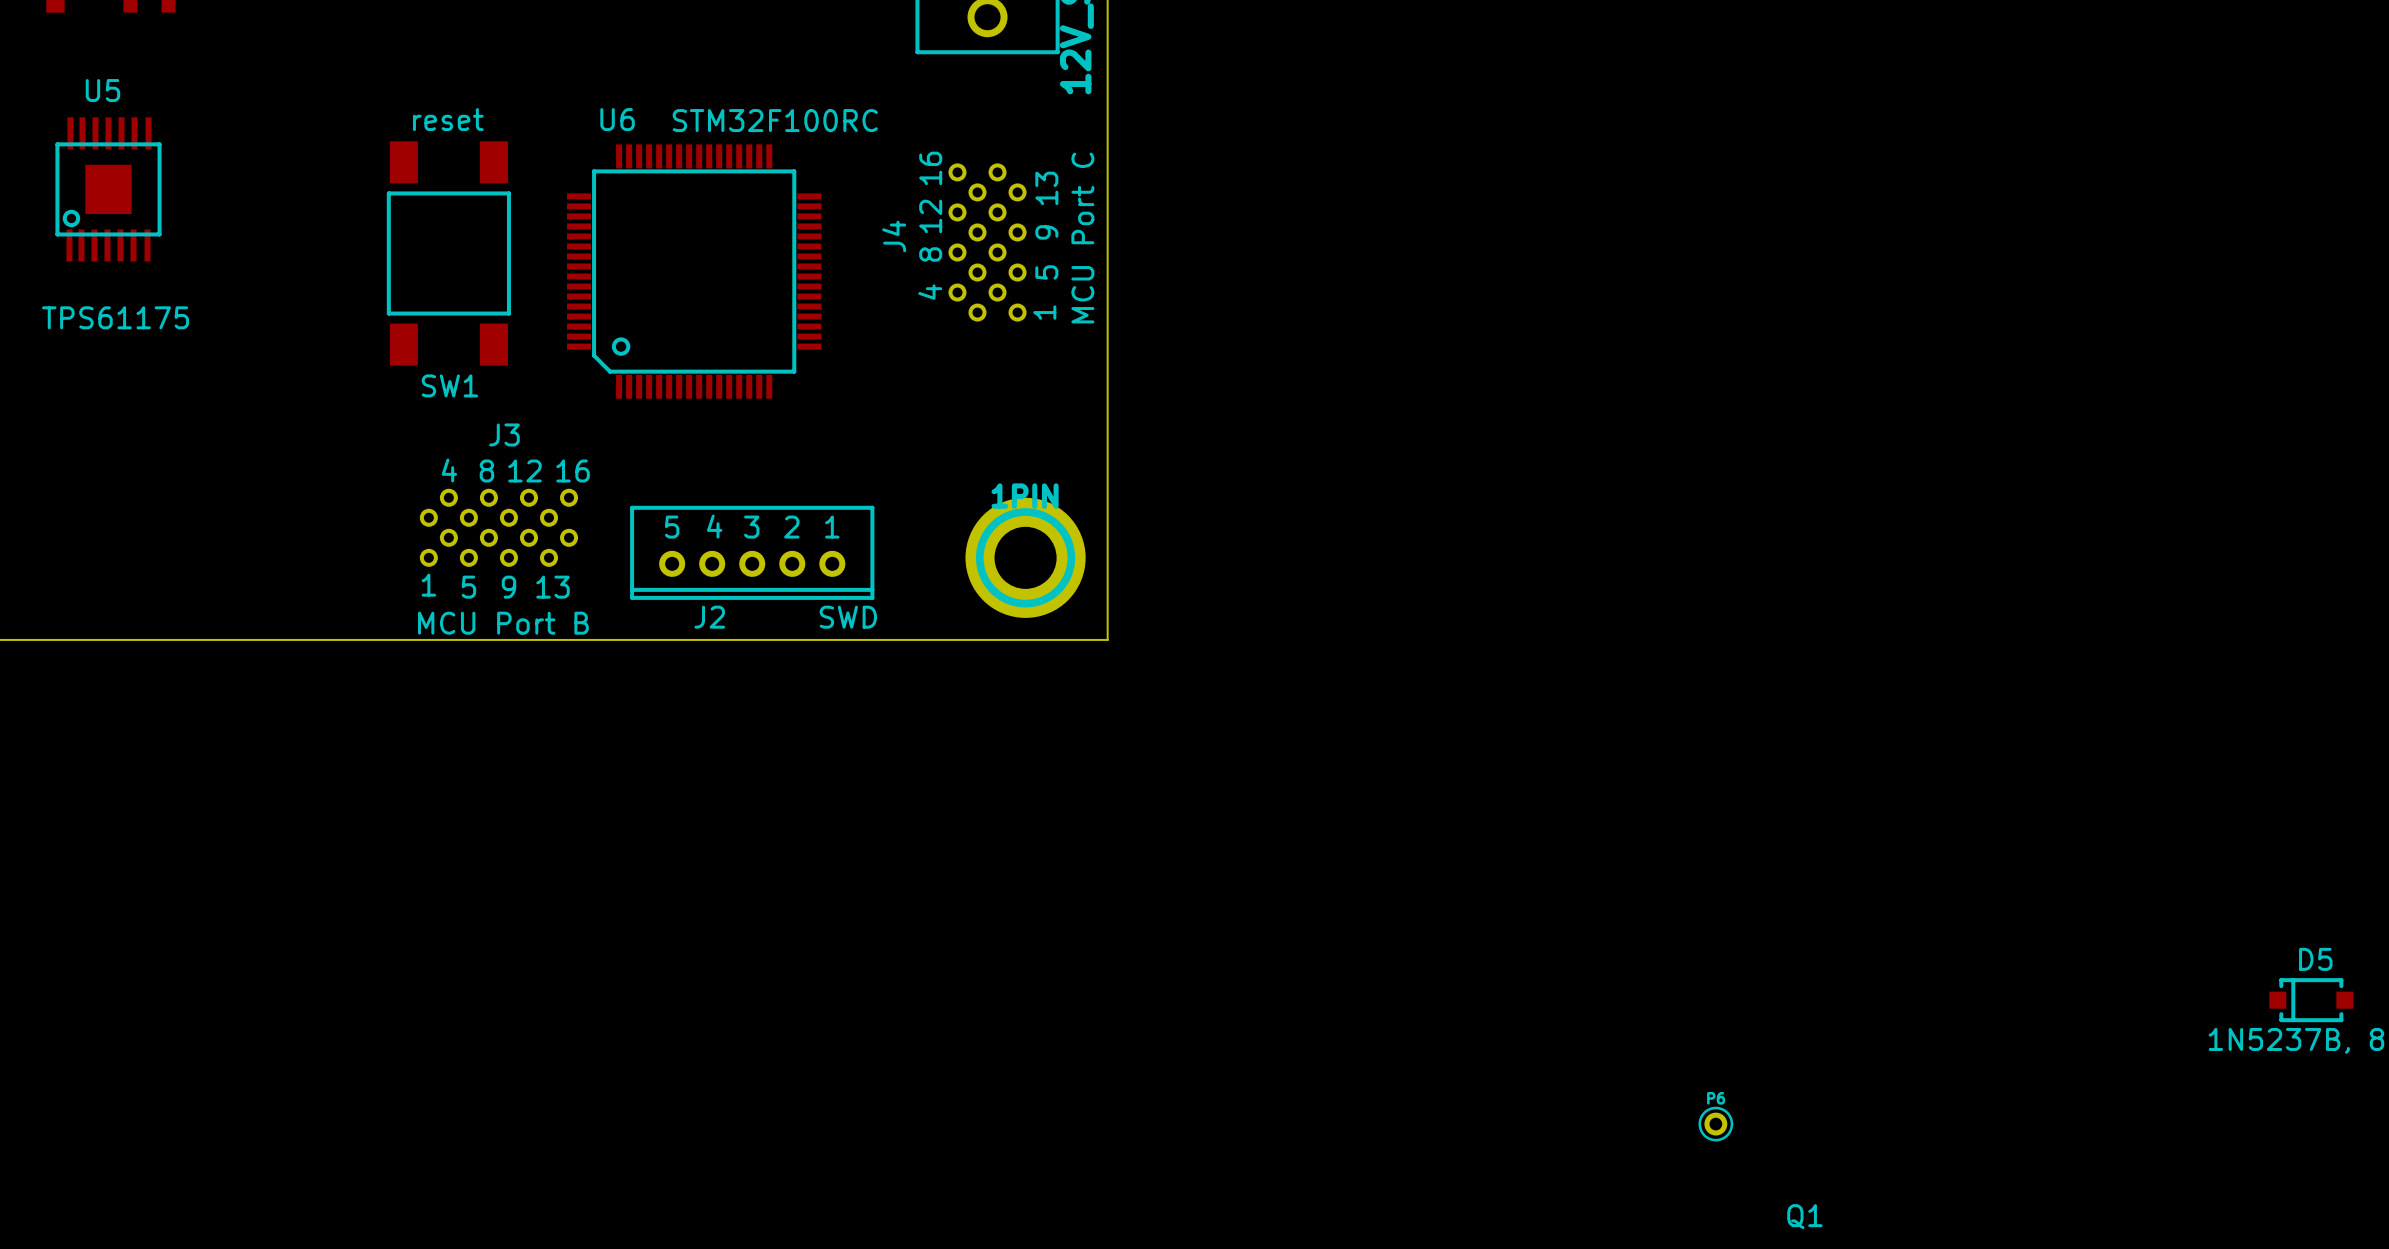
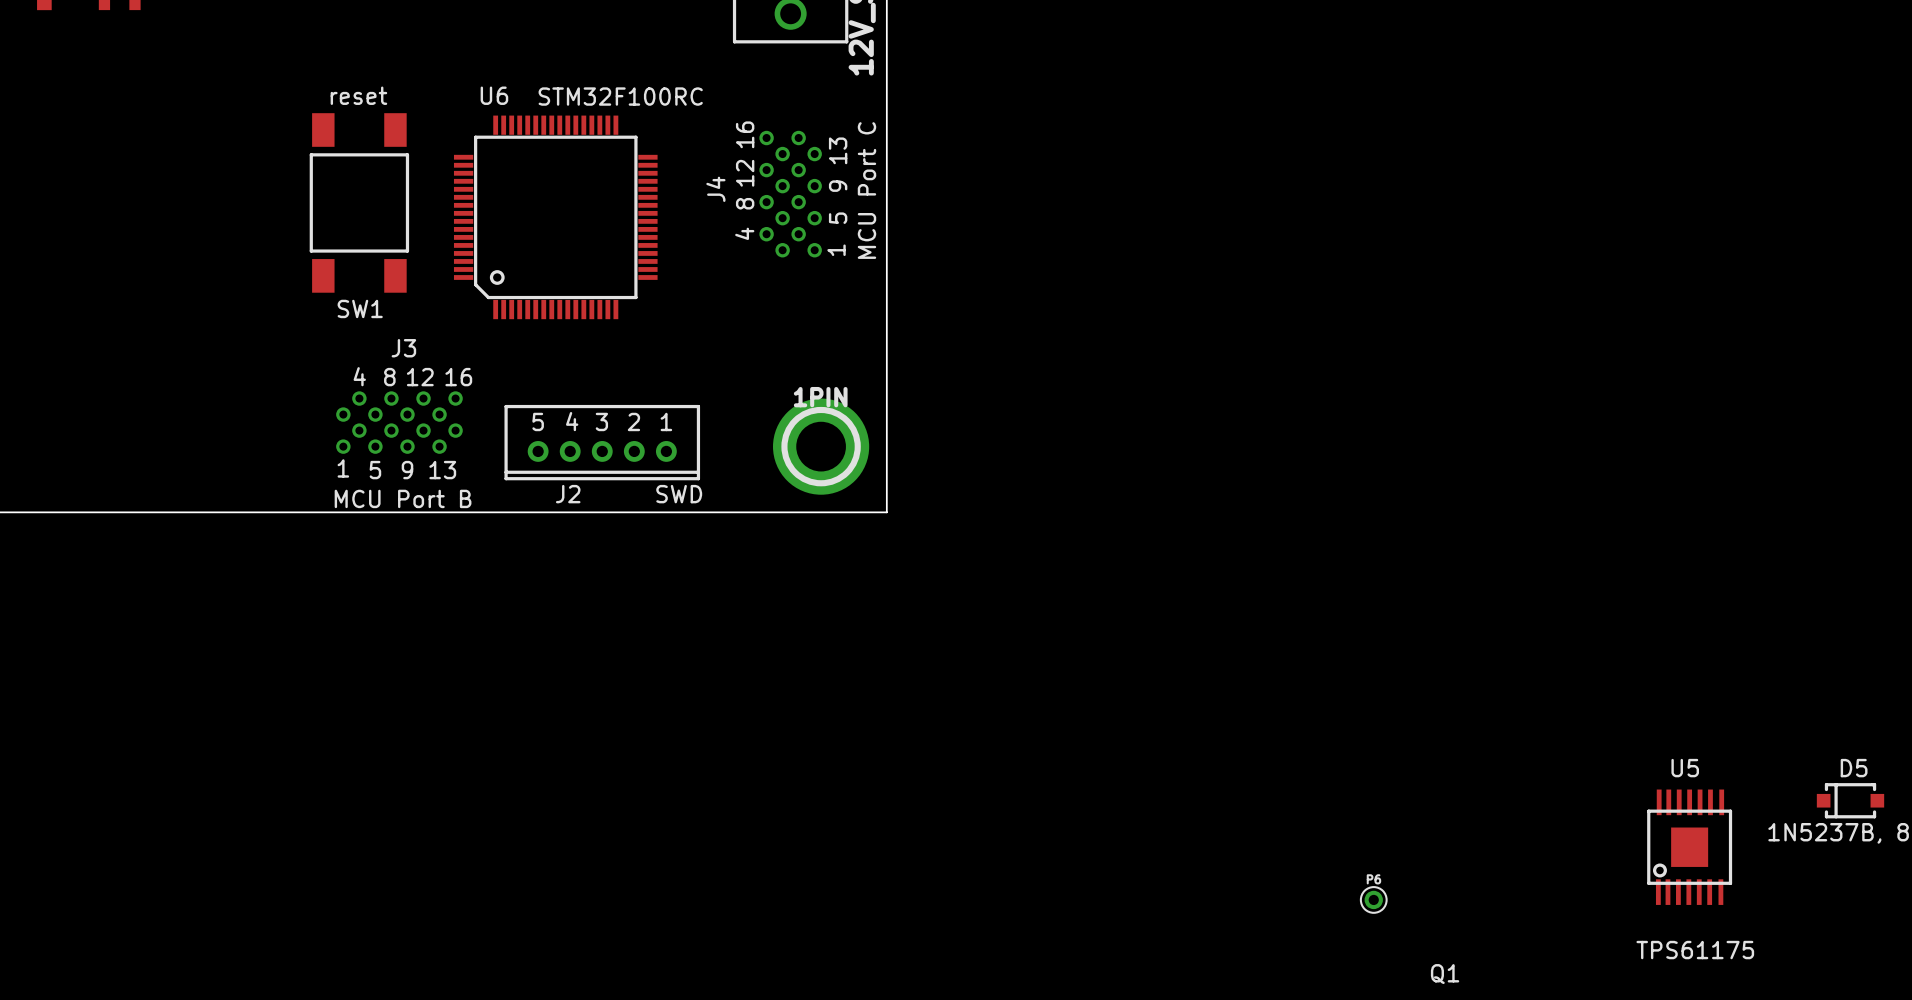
U5 position: (108, 189) -> (1689, 847)

